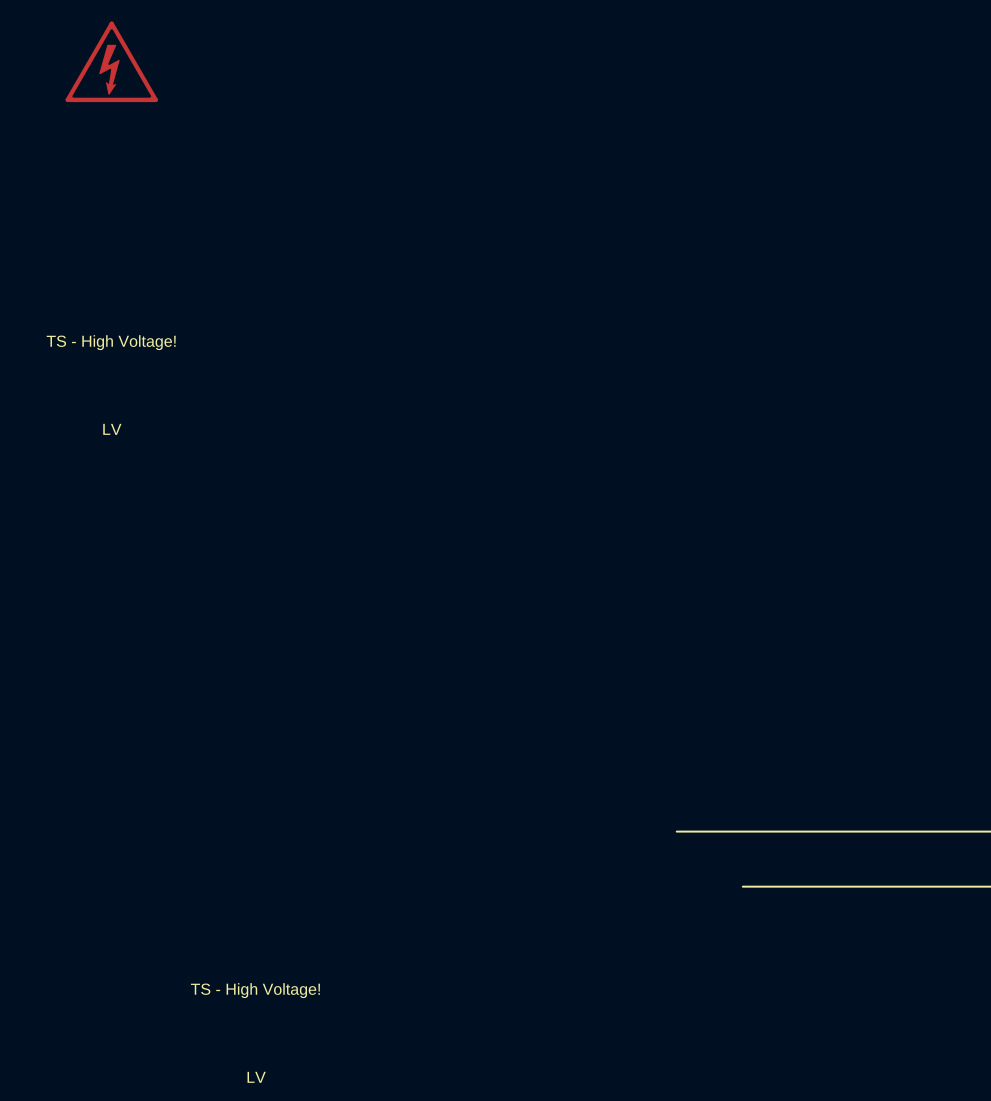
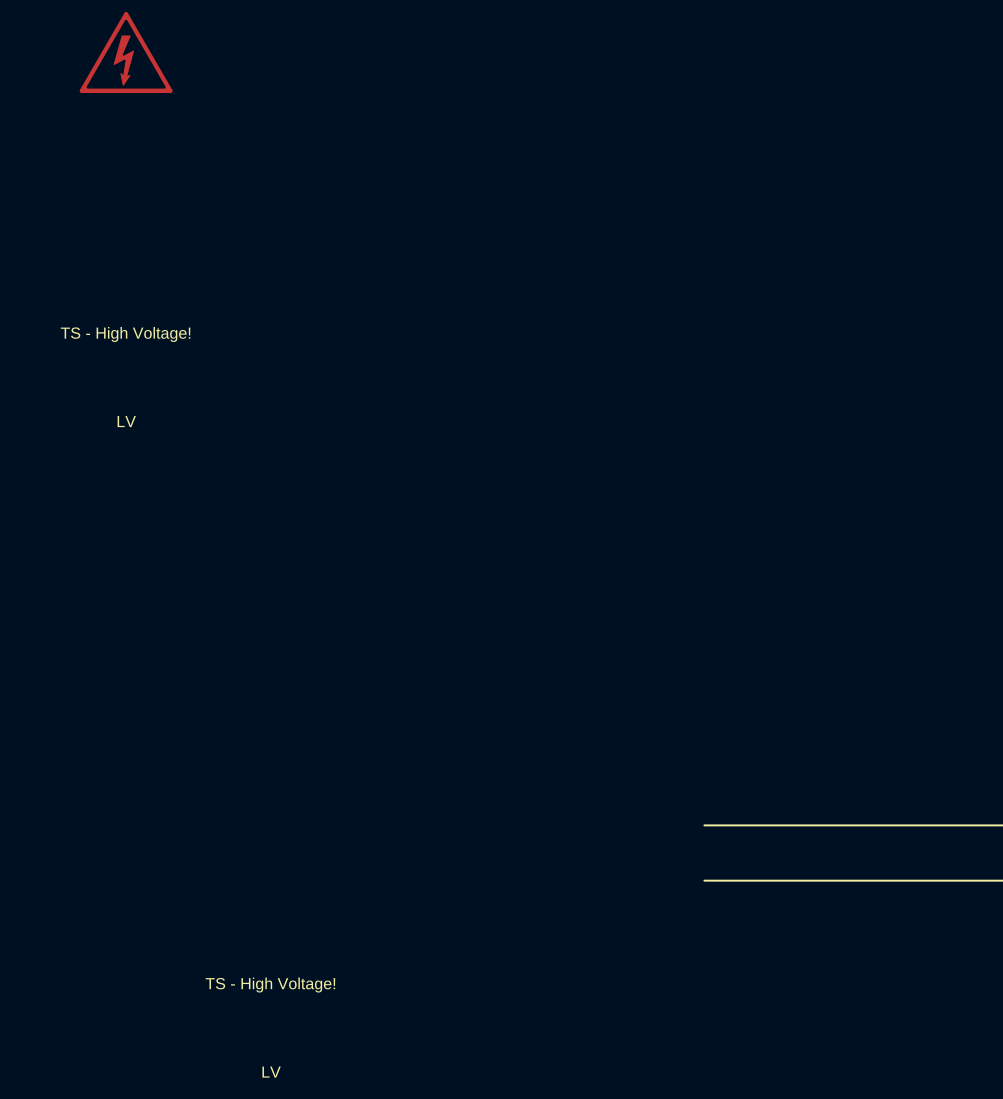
line: (676, 831) (687, 831) -> none
line: none -> (704, 880) (759, 880)

